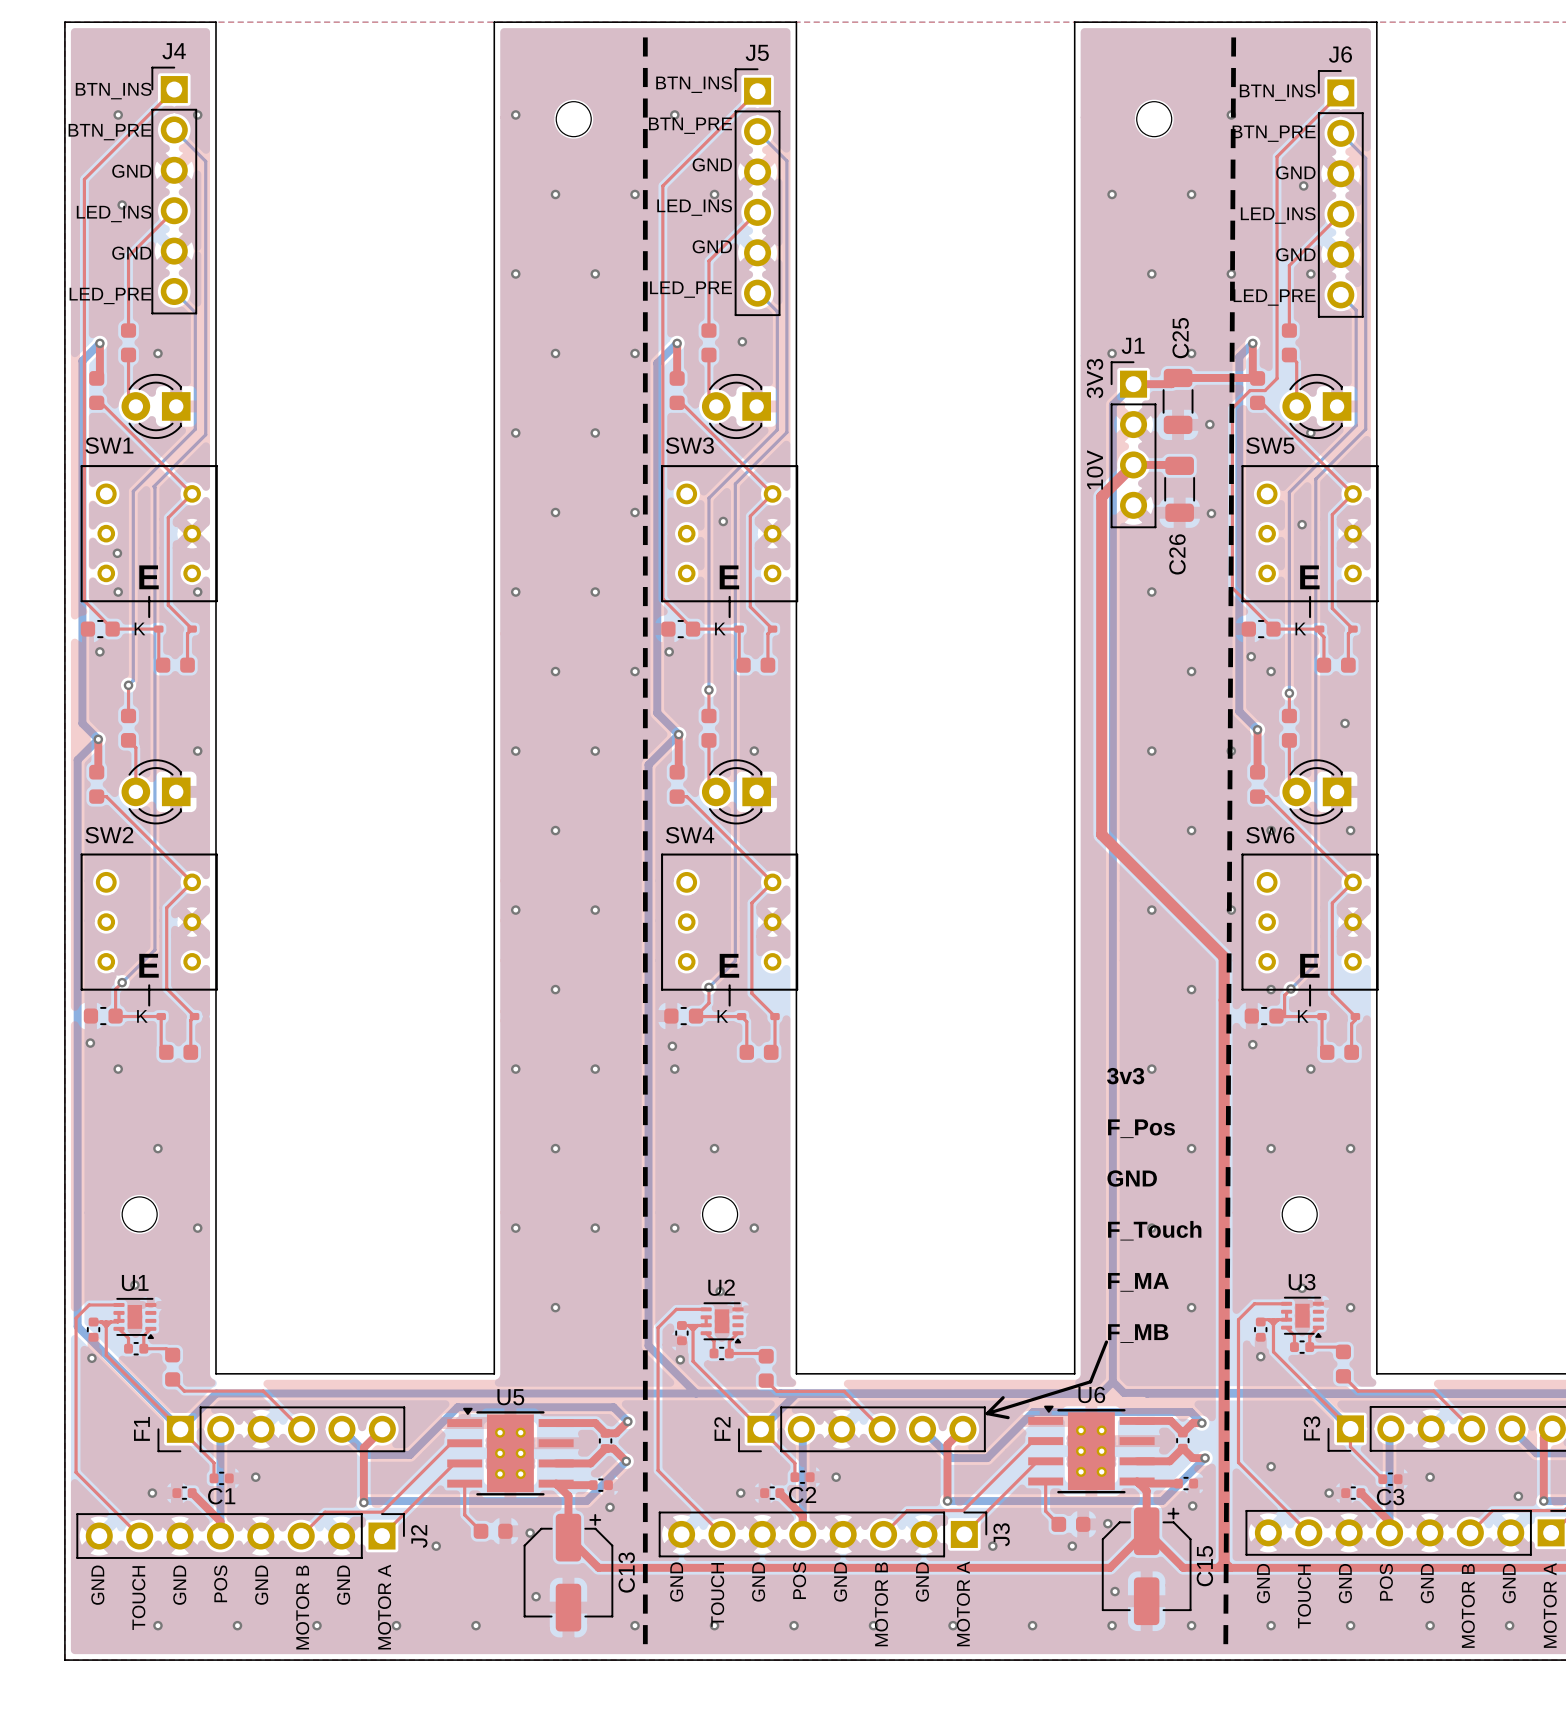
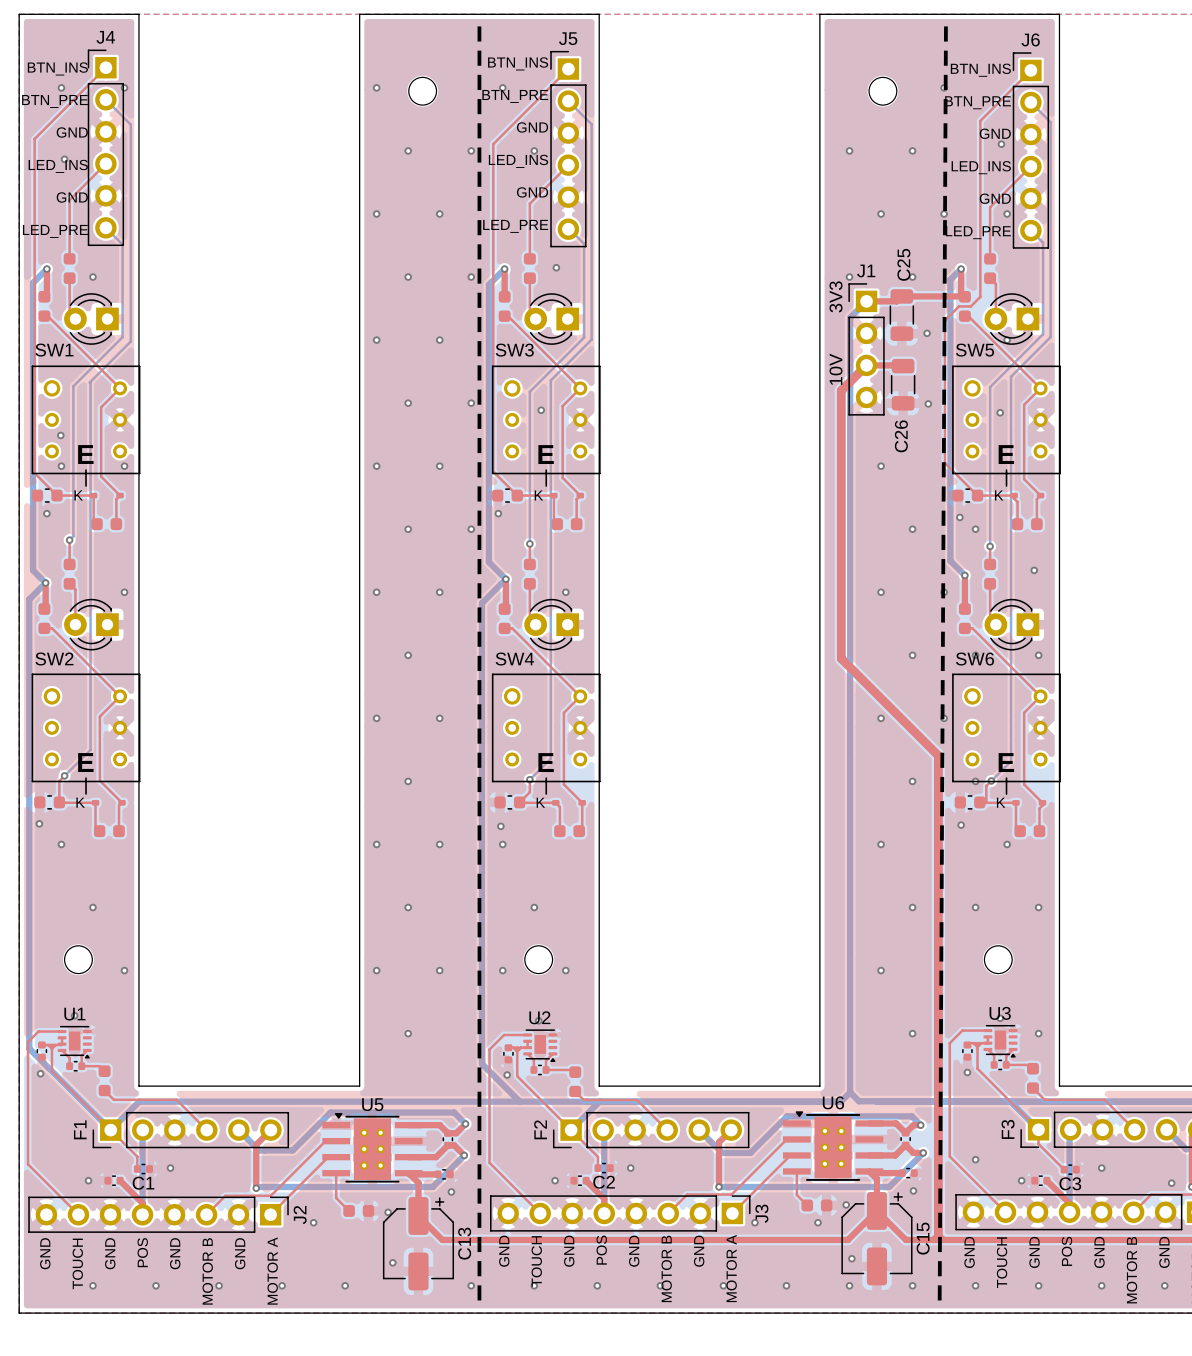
text: 3v3 (1125, 1076) -> none
text: F_Pos (1141, 1128) -> none
text: GND (1132, 1178) -> none
text: F_Touch (1154, 1230) -> none
text: F_MA (1138, 1282) -> none
text: F_MB (1138, 1333) -> none
line: (1106, 1342) (1090, 1381) (987, 1413) -> none
line: (1003, 1397) (987, 1413) -> none
line: (987, 1413) (1008, 1417) -> none

